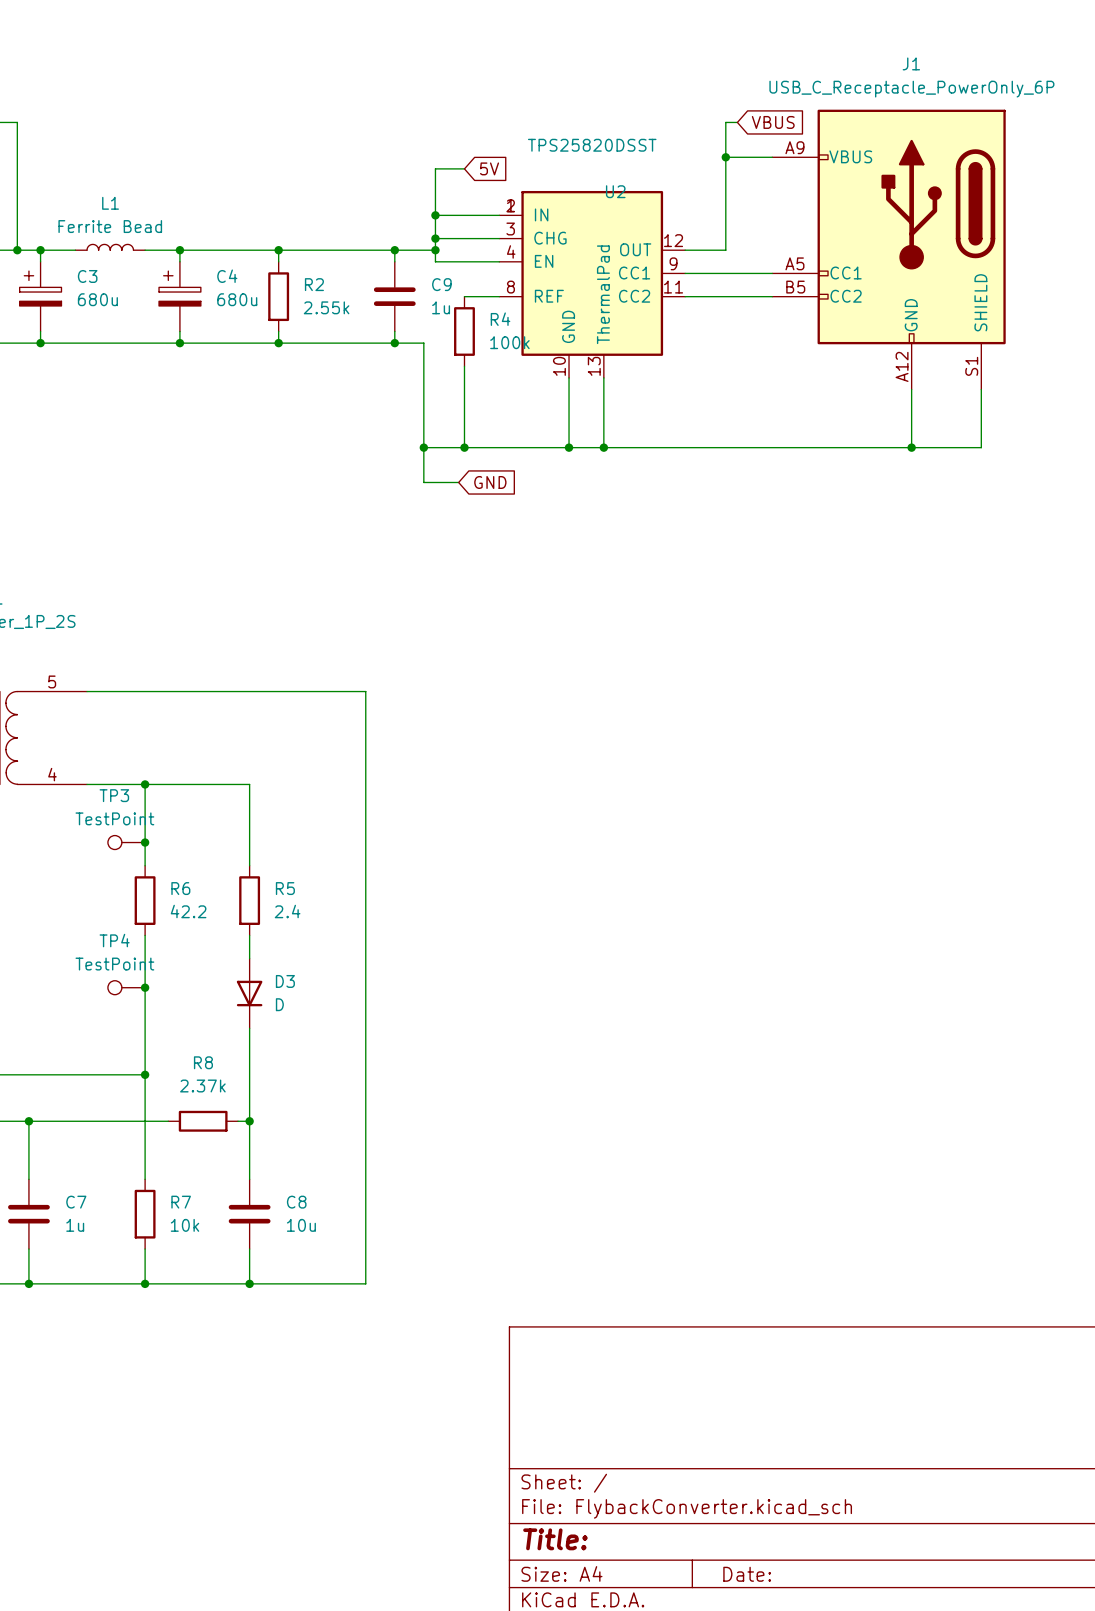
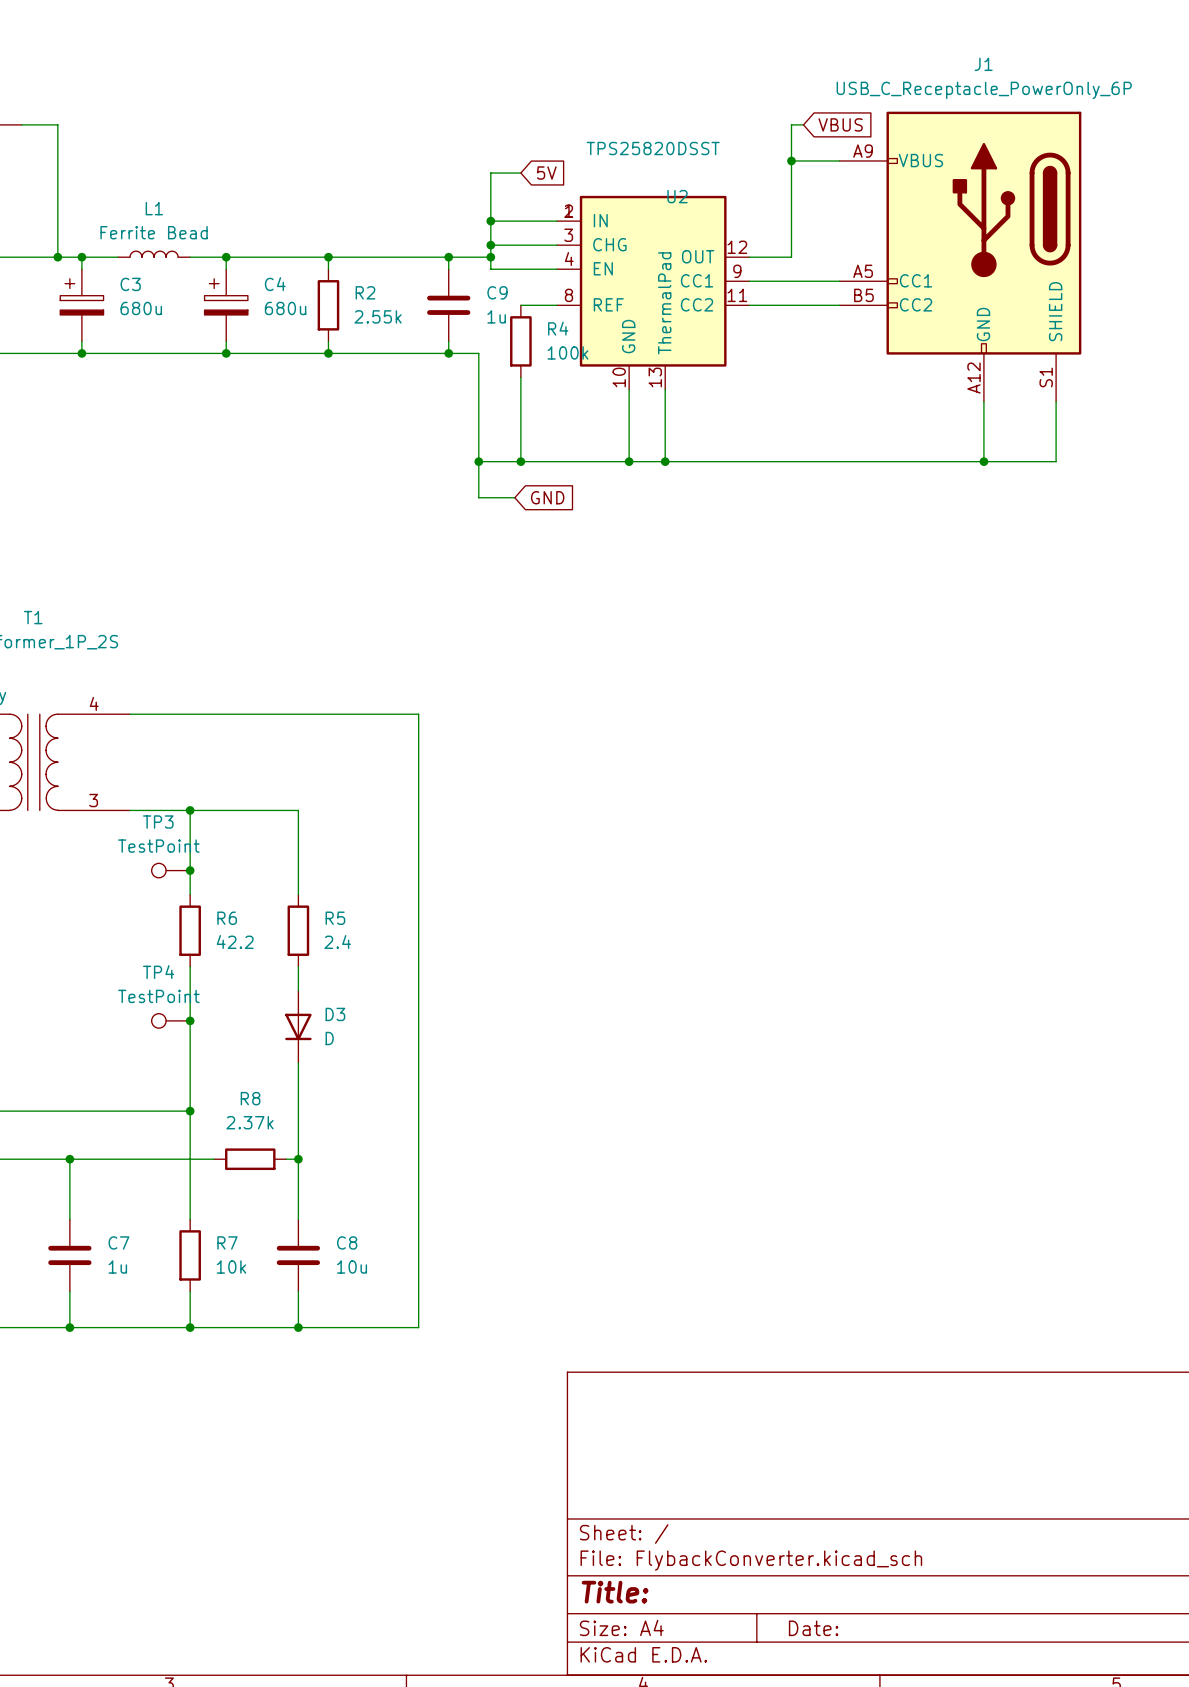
T1 pin number: 5 (52, 681) -> 4 (94, 704)
T1 pin number: 4 (52, 774) -> 3 (93, 800)

